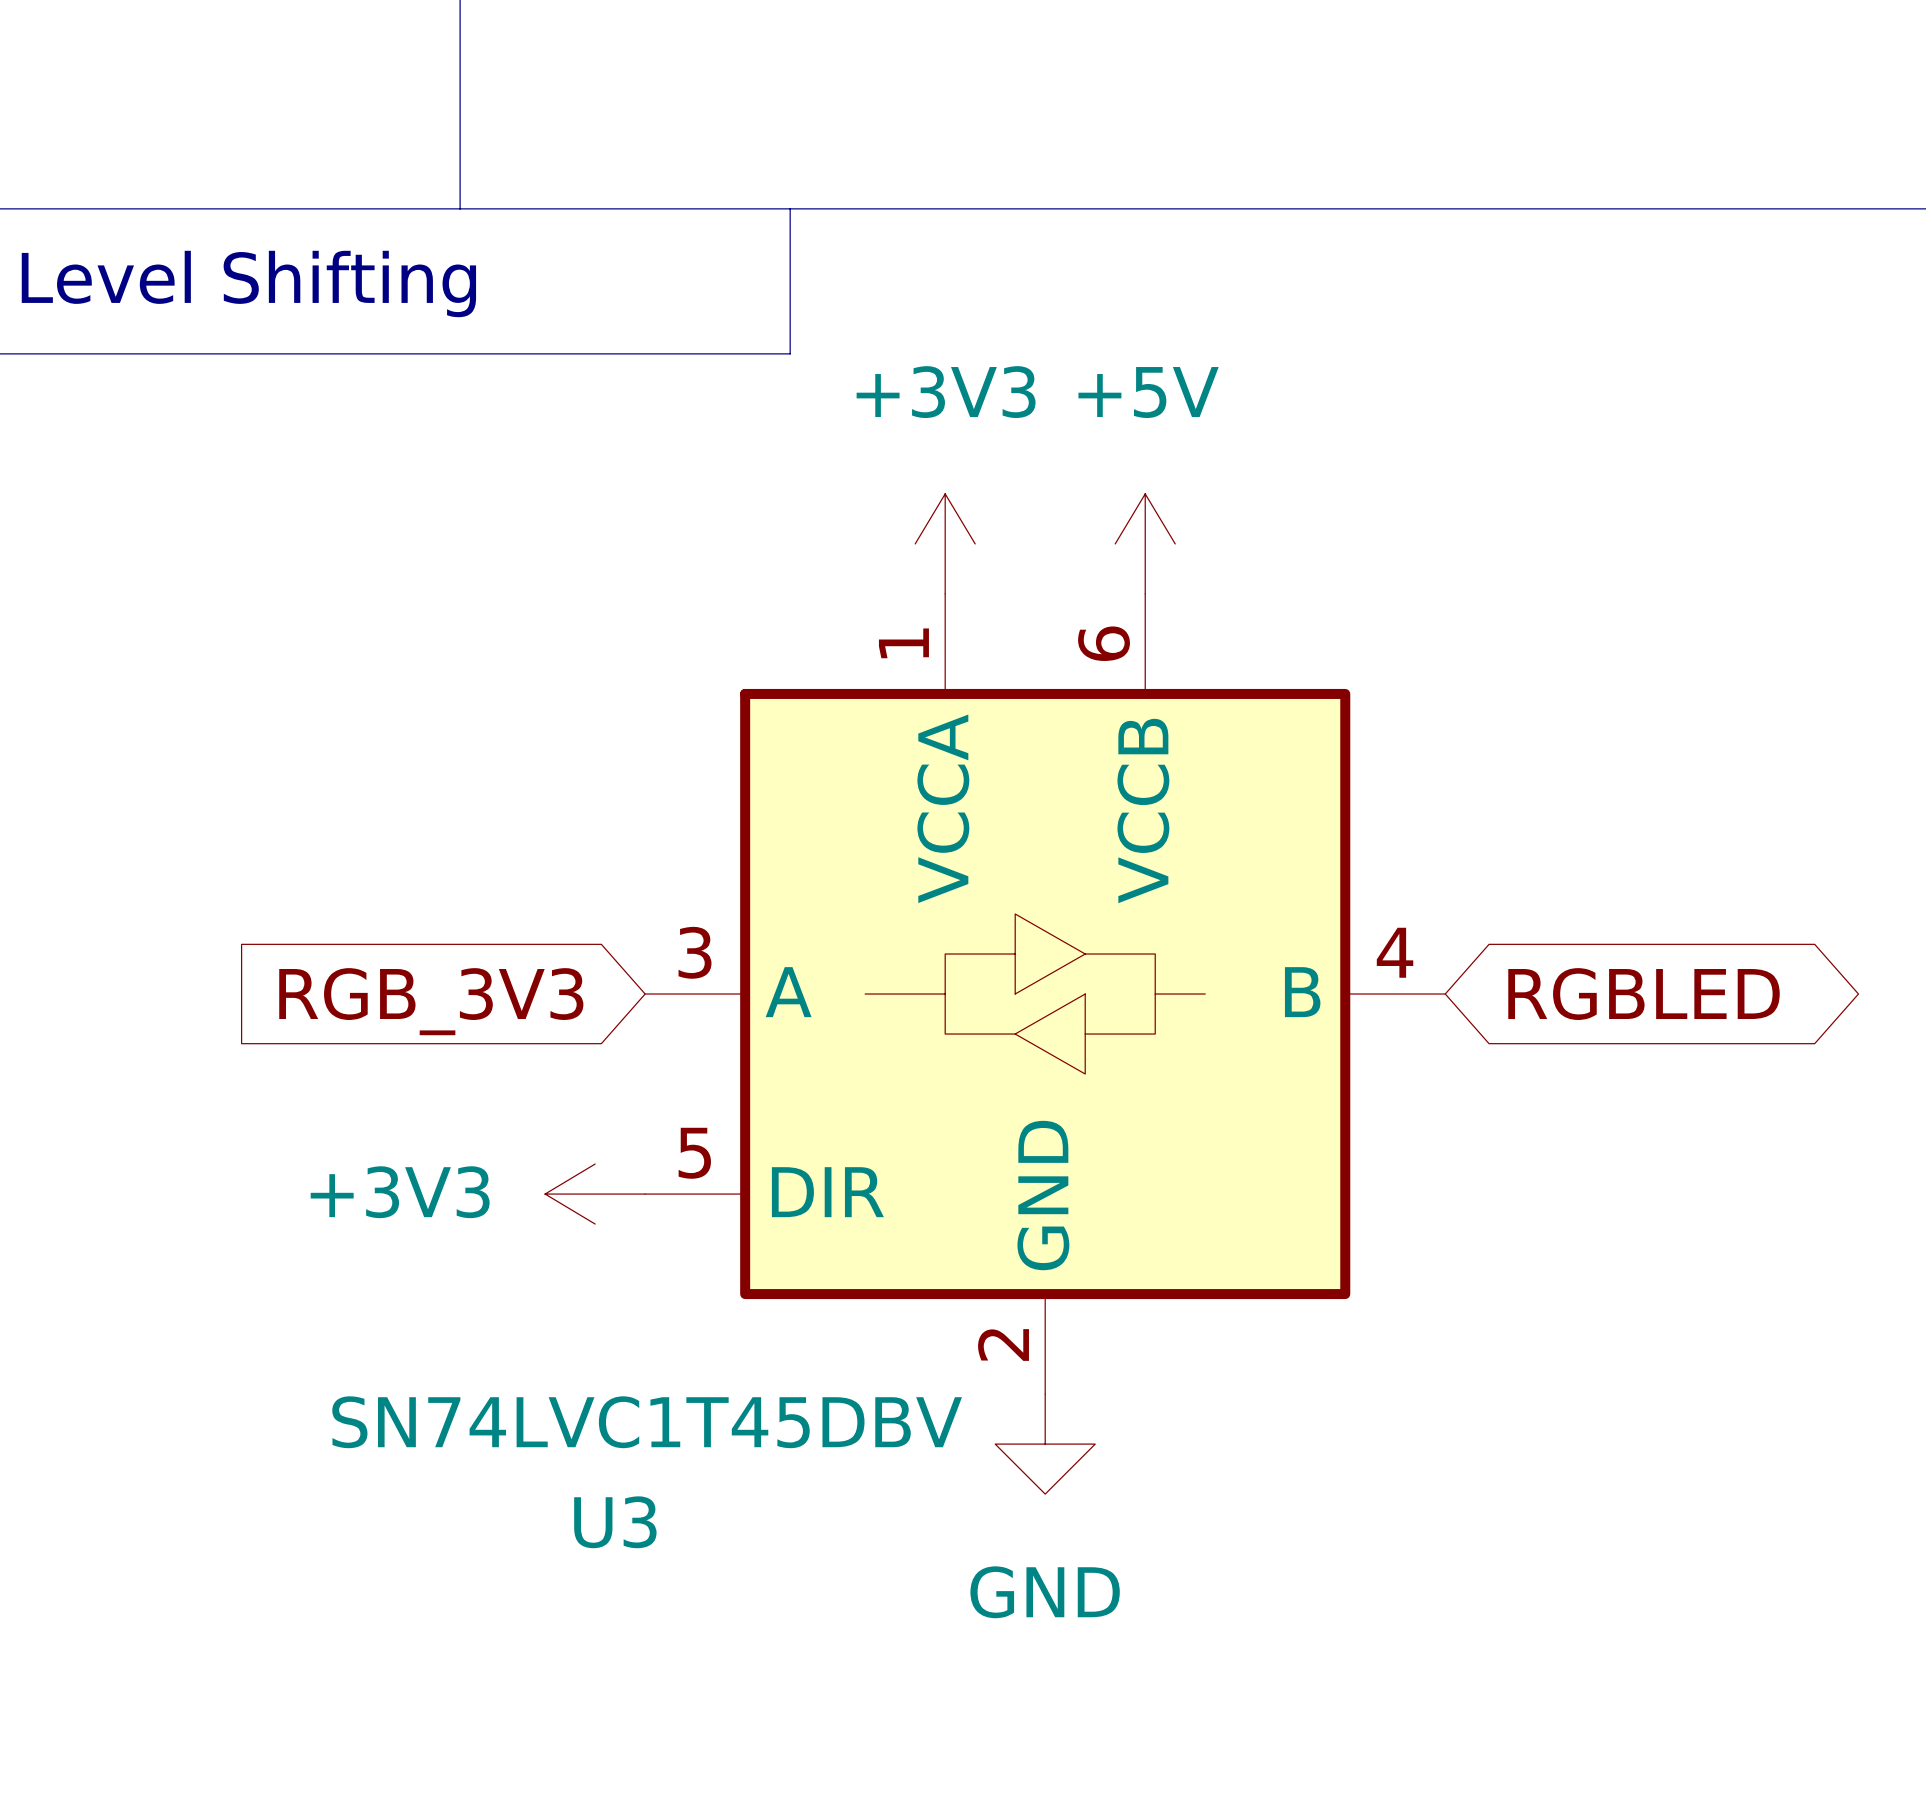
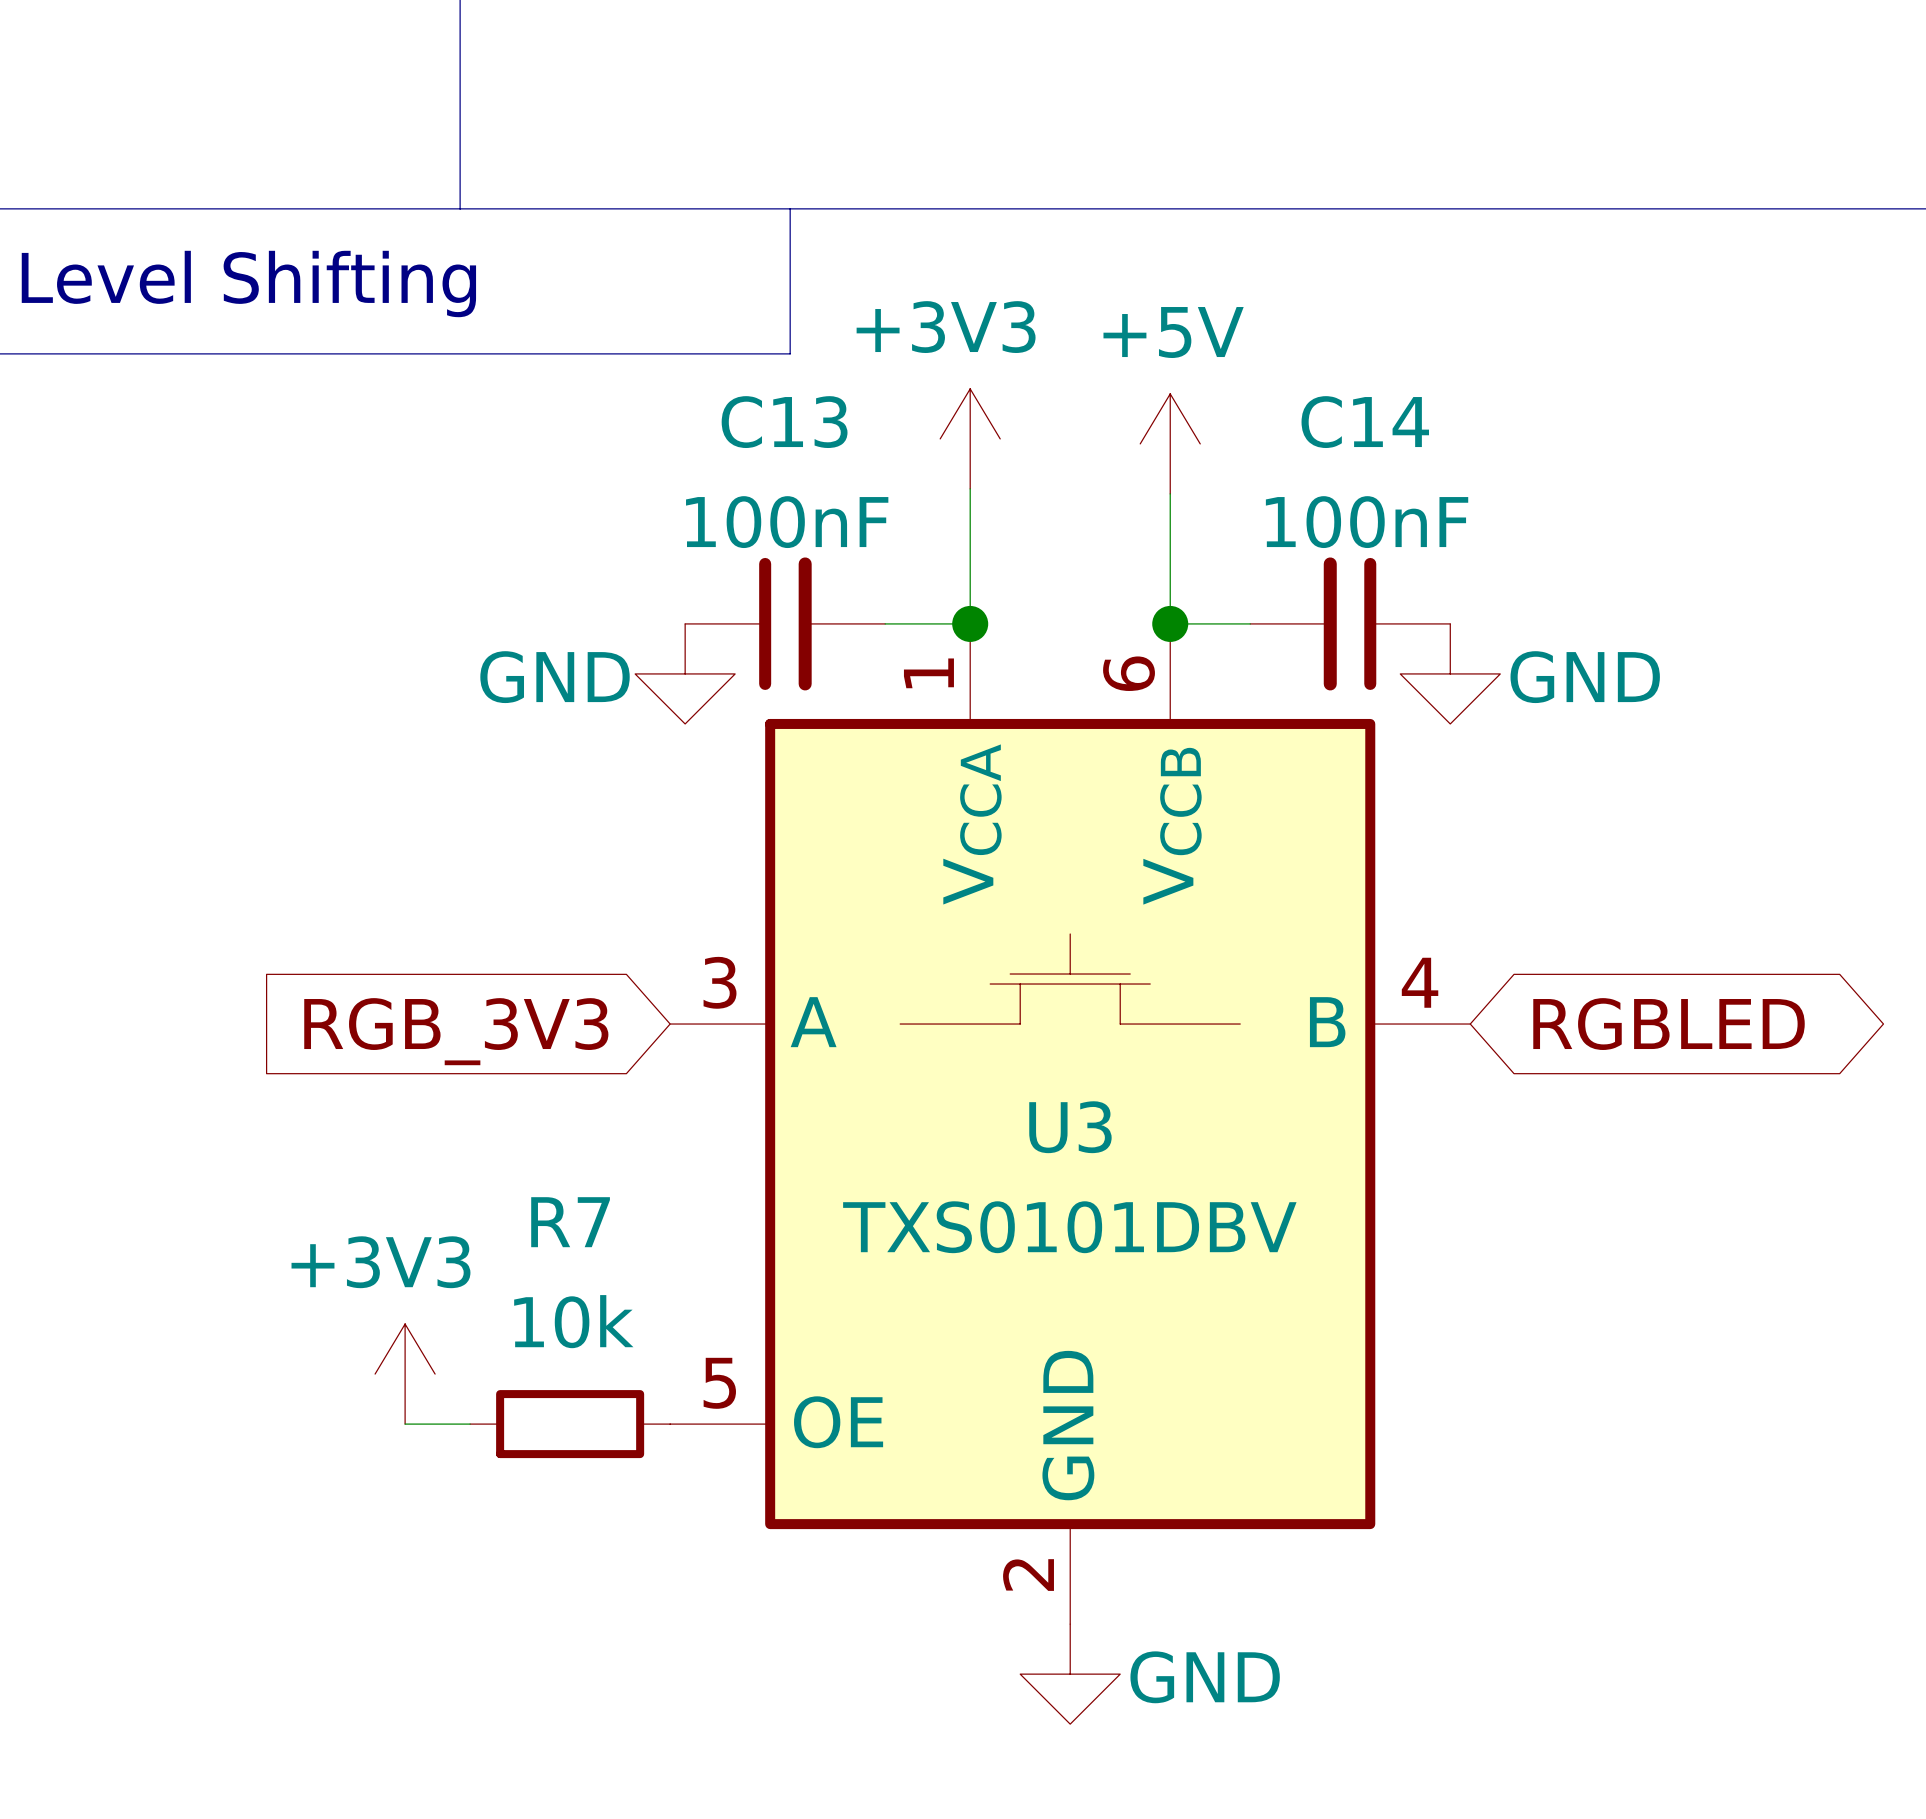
power symbol text position: +3V3 (946, 392) -> +3V3 (946, 327)
power symbol text position: +5V (1148, 392) -> +5V (1173, 332)
wire: none -> (970, 488) (970, 623) (885, 623)
wire: none -> (1170, 493) (1170, 623) (1250, 623)
power symbol position: +3V3 (945, 543) -> +3V3 (970, 438)
power symbol position: +5V (1145, 543) -> +5V (1170, 443)
U3 symbol: [645, 593, 1446, 1395] -> [670, 623, 1471, 1625]
C13: none -> 100nF (785, 623)
junction: none -> (970, 623)
junction: none -> (1170, 623)
C14: none -> 100nF (1350, 623)
power symbol: none -> GND (685, 673)
power symbol: none -> GND (1450, 673)
global label position: RGBLED (1644, 994) -> RGBLED (1669, 1024)
global label position: RGB_3V3 (431, 1001) -> RGB_3V3 (456, 1031)
power symbol text position: +3V3 (400, 1192) -> +3V3 (380, 1262)
power symbol rotation: 0° (595, 1194) -> 90° clockwise (405, 1374)
power symbol position: +3V3 (595, 1194) -> +3V3 (405, 1374)
U3 value: SN74LVC1T45DBV (647, 1422) -> TXS0101DBV (1069, 1227)
wire: none -> (405, 1424) (470, 1424)
R7: none -> 10k (570, 1424)
power symbol position: GND (1045, 1444) -> GND (1070, 1674)
U3 name position: U3 (615, 1522) -> U3 (1070, 1127)
power symbol text position: GND (1045, 1592) -> GND (1205, 1677)

